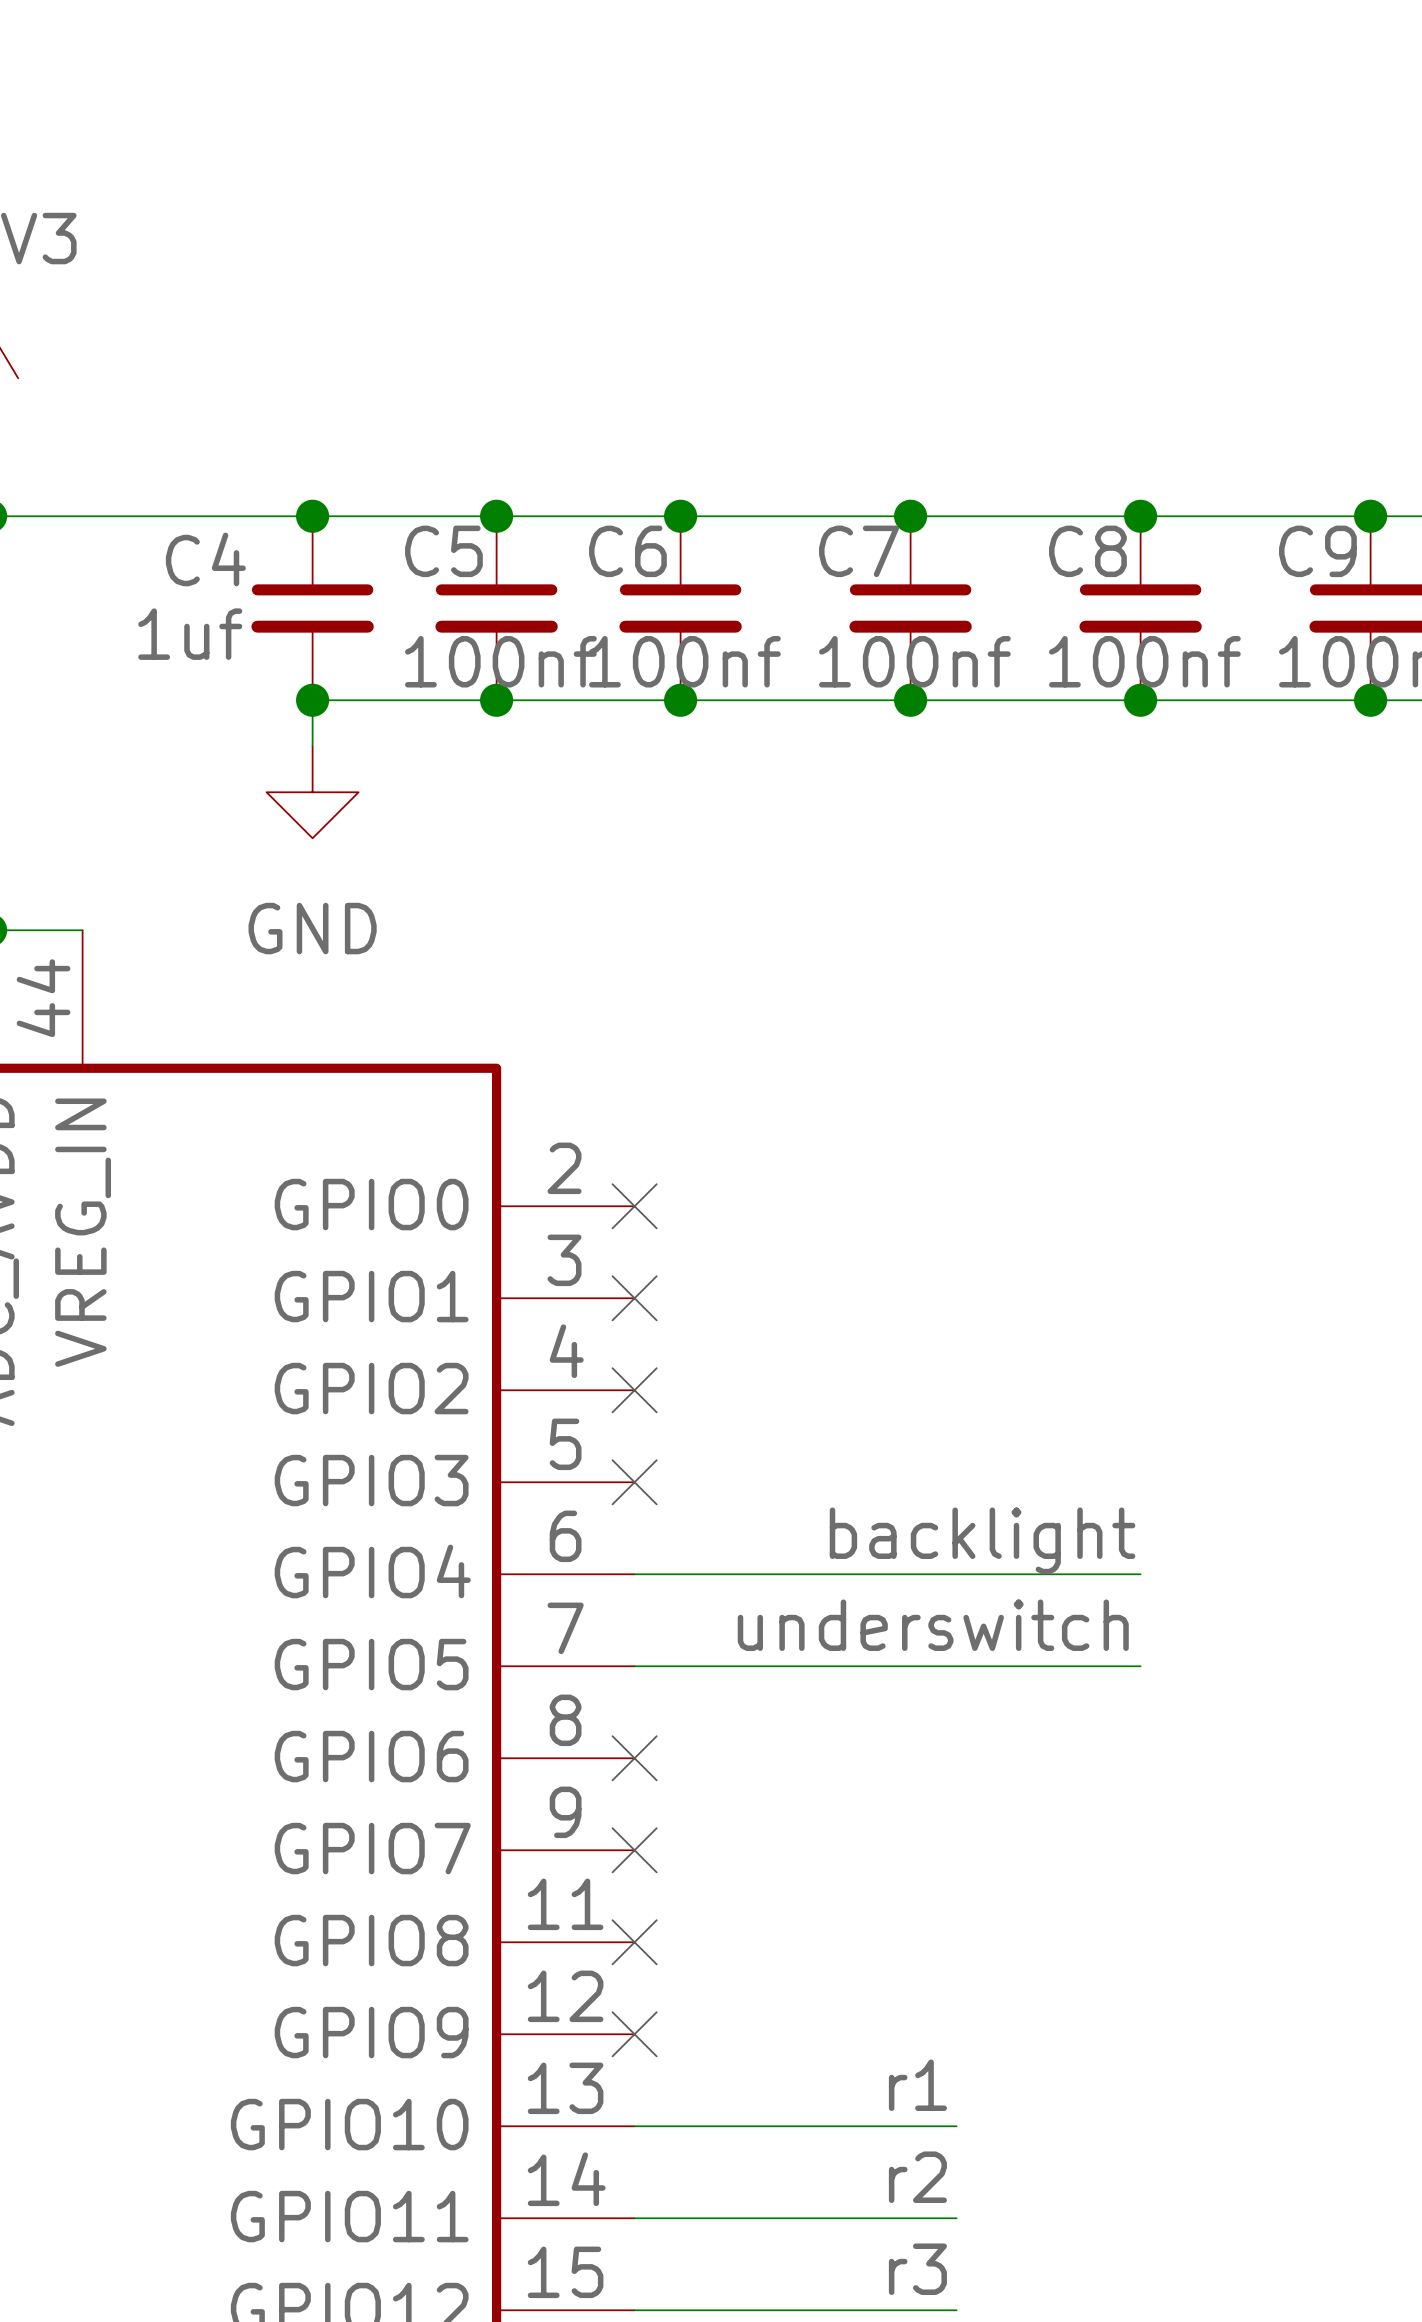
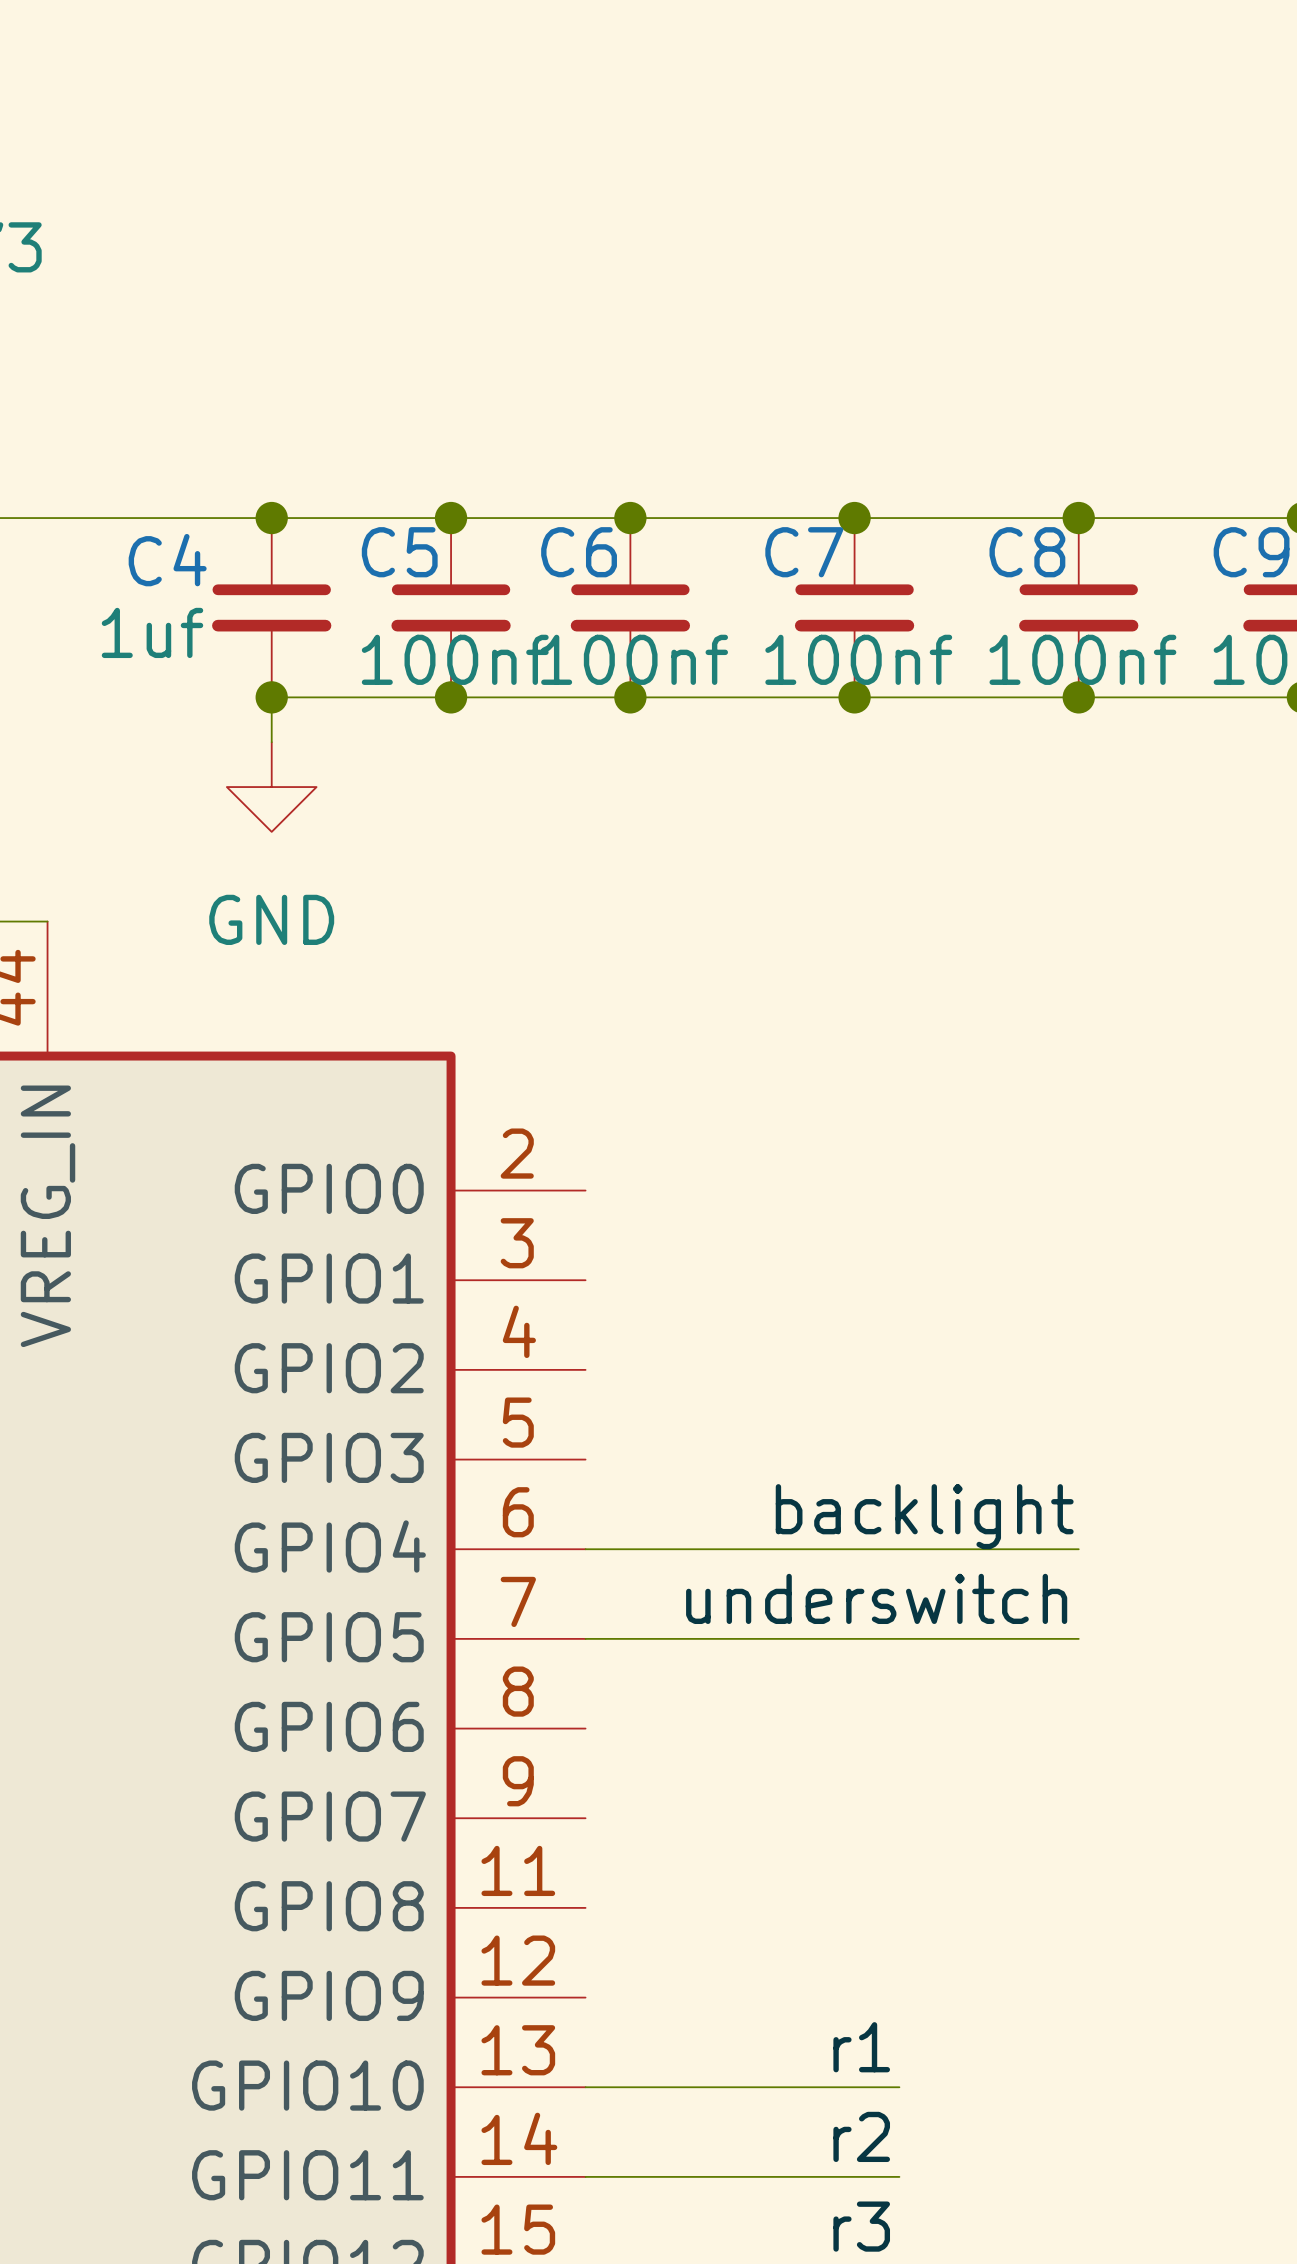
no-connect mark: (634, 1206) -> none
no-connect mark: (634, 1298) -> none
no-connect mark: (634, 1390) -> none
no-connect mark: (634, 1482) -> none
no-connect mark: (634, 1758) -> none
no-connect mark: (634, 1850) -> none
no-connect mark: (634, 1942) -> none
no-connect mark: (634, 2034) -> none

